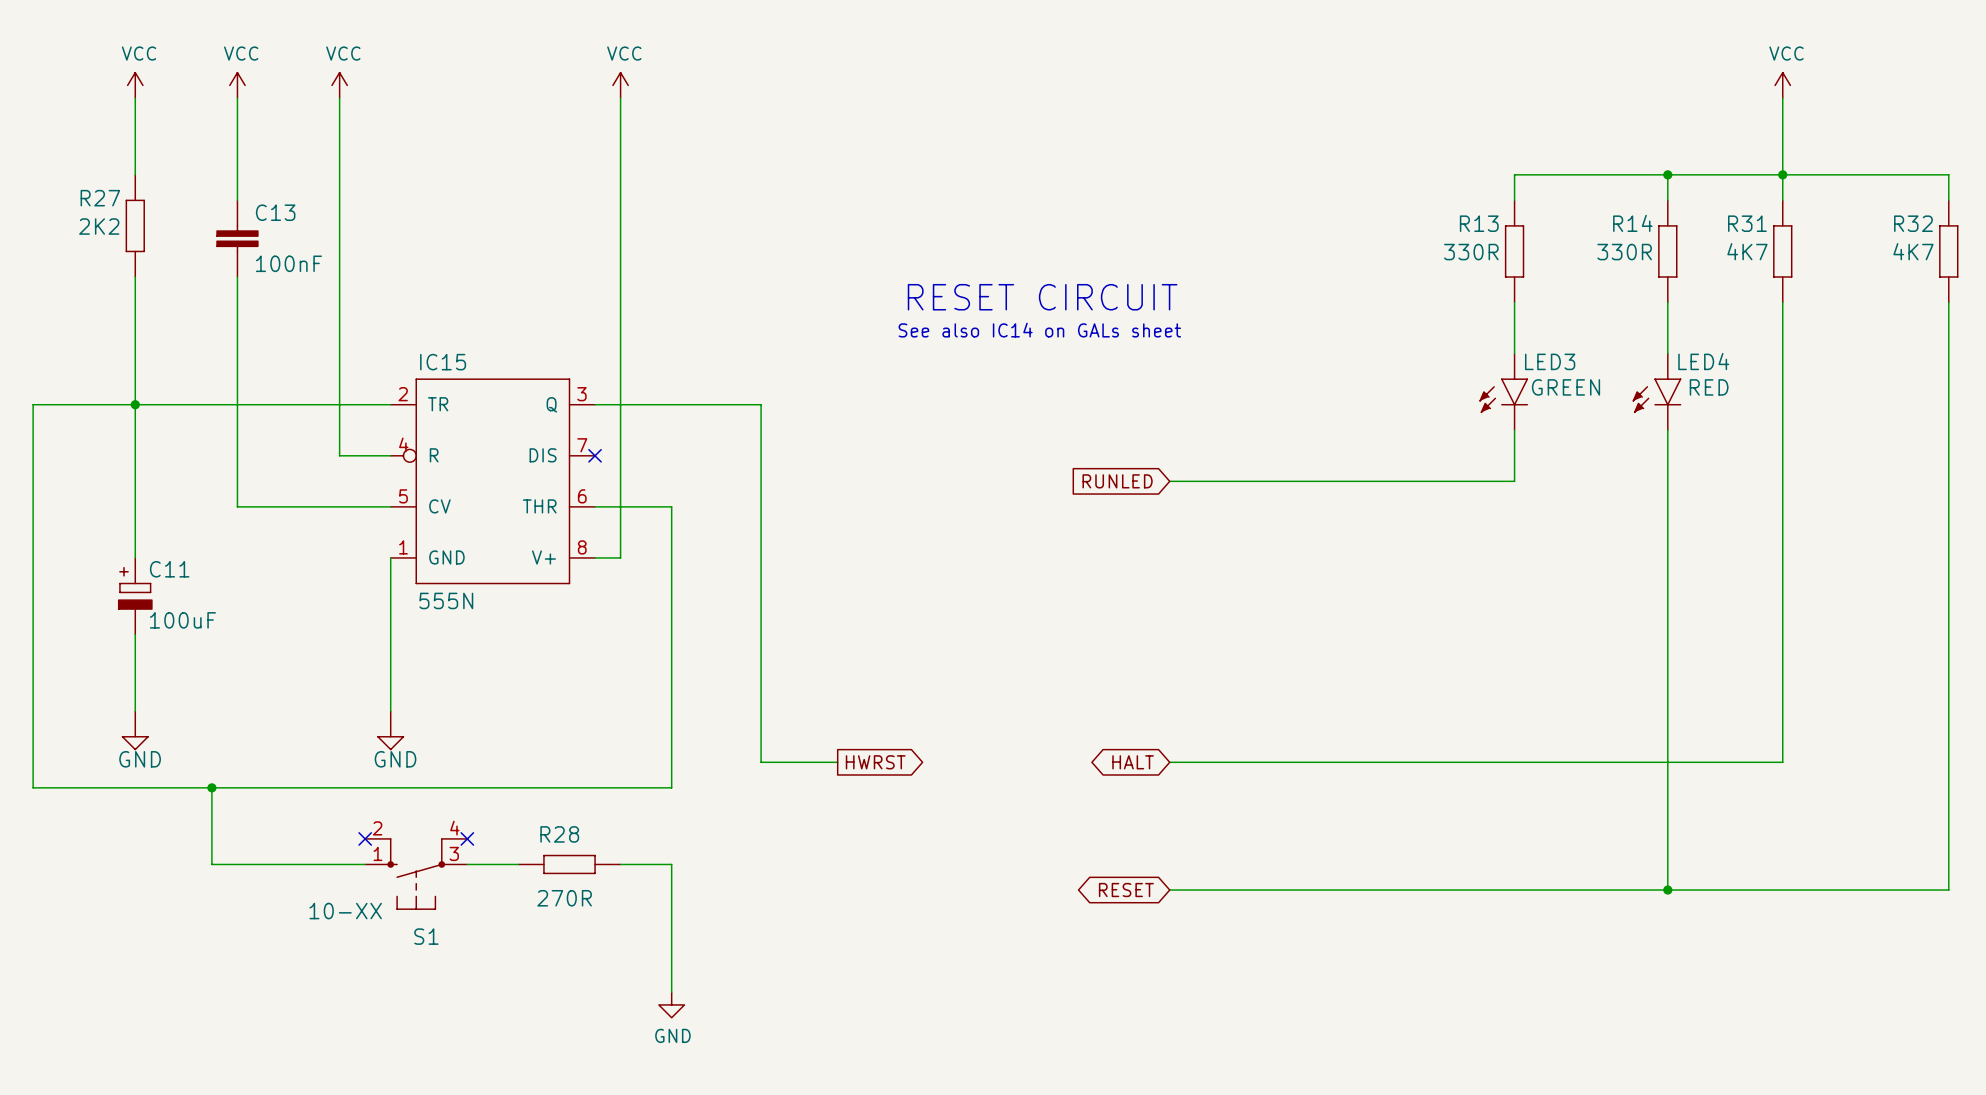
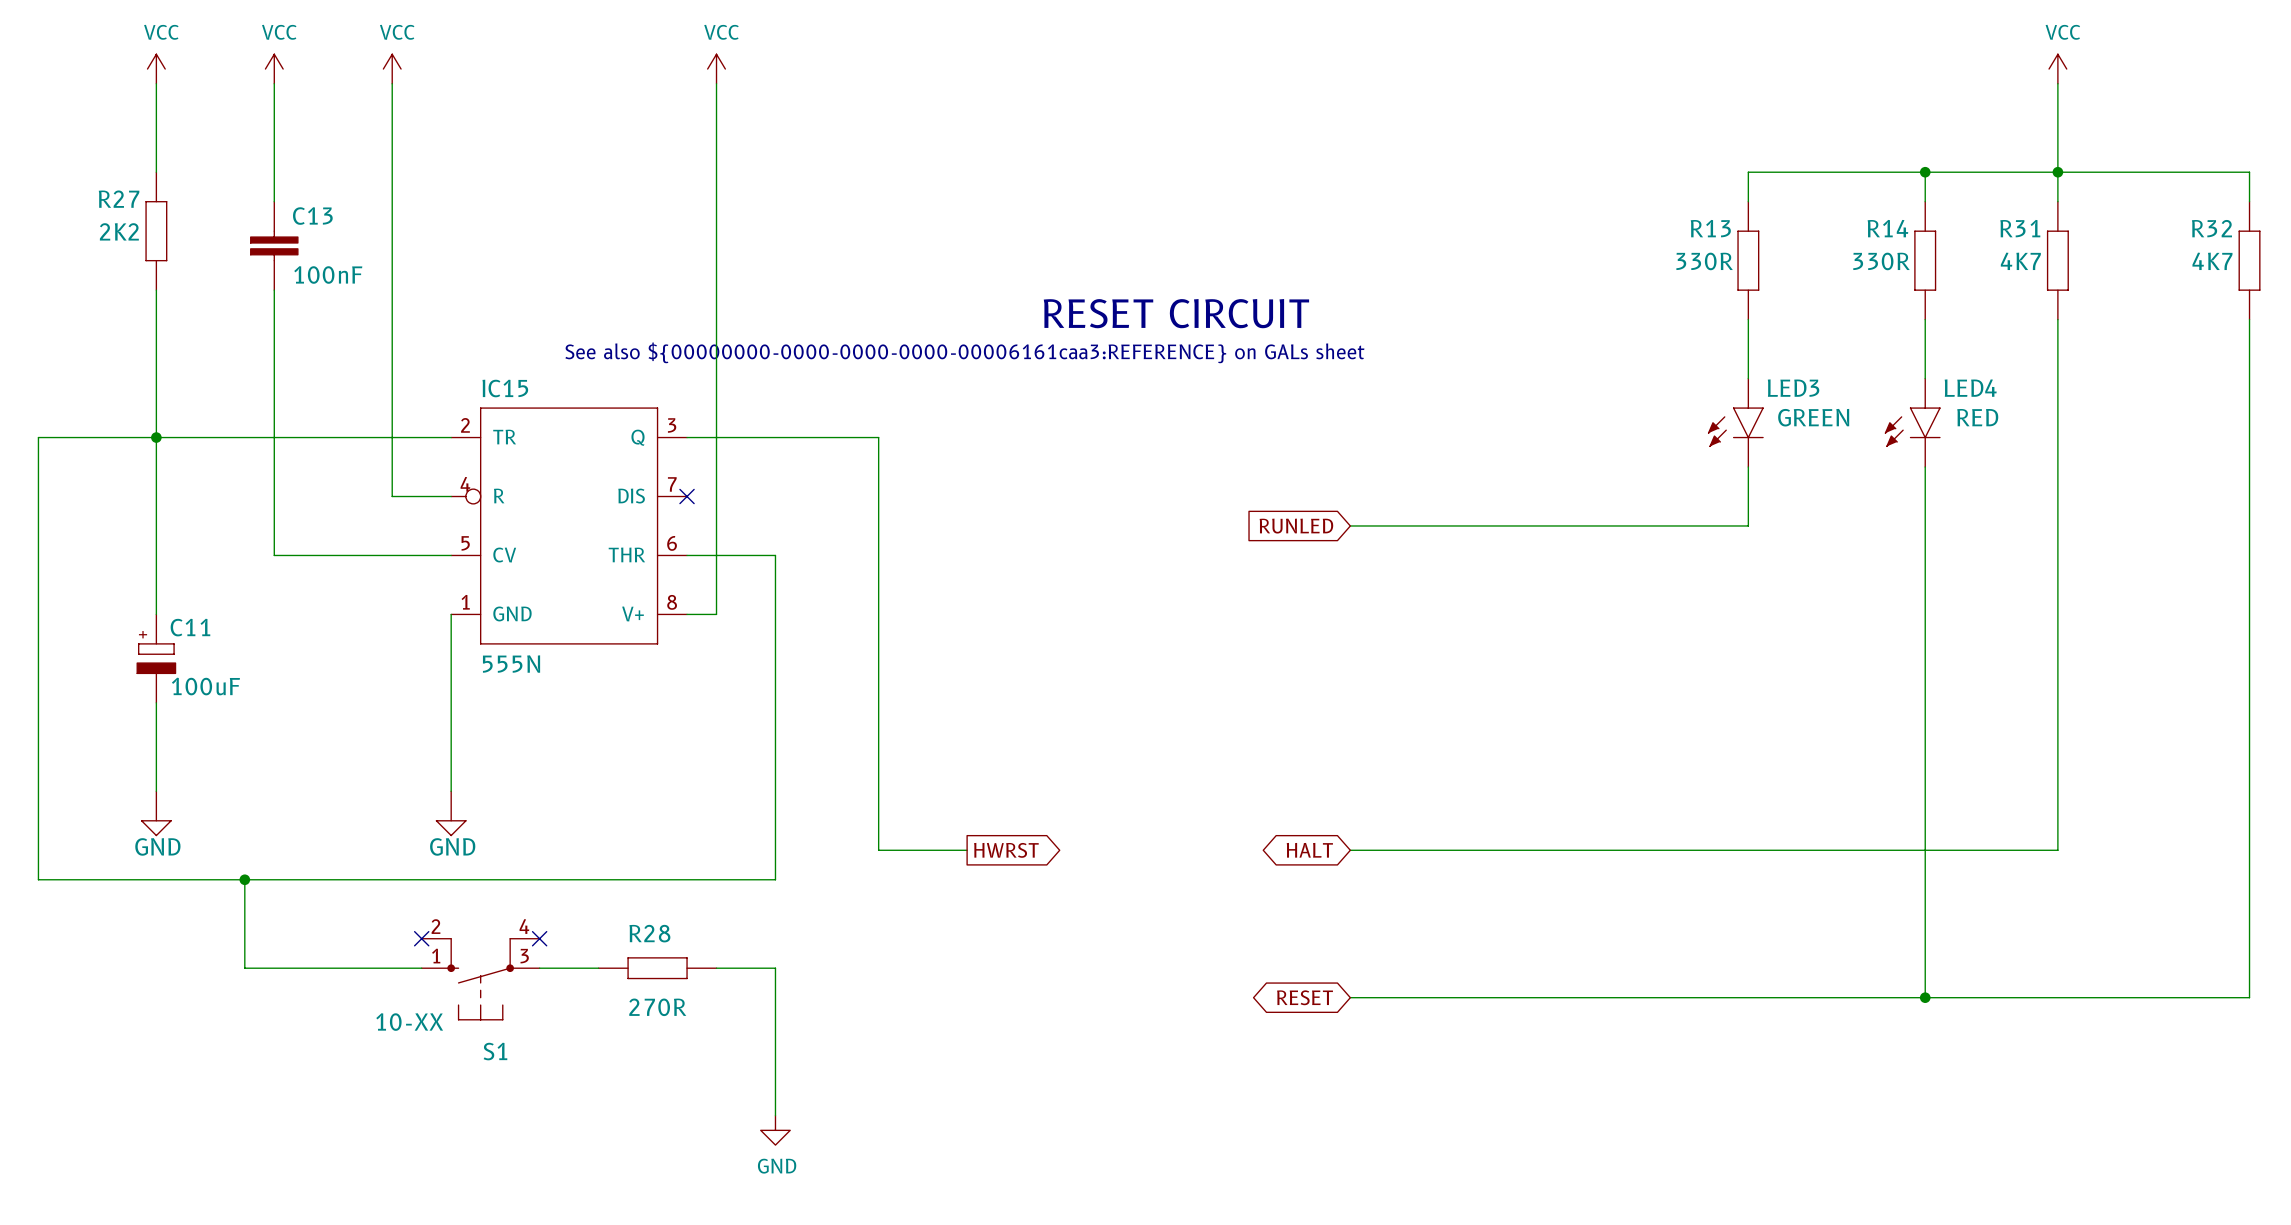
text: See also IC14 on GALs sheet (1039, 330) -> See also ${00000000-0000-0000-0000-00006161caa3:REFERENCE} on GALs sheet (964, 352)

